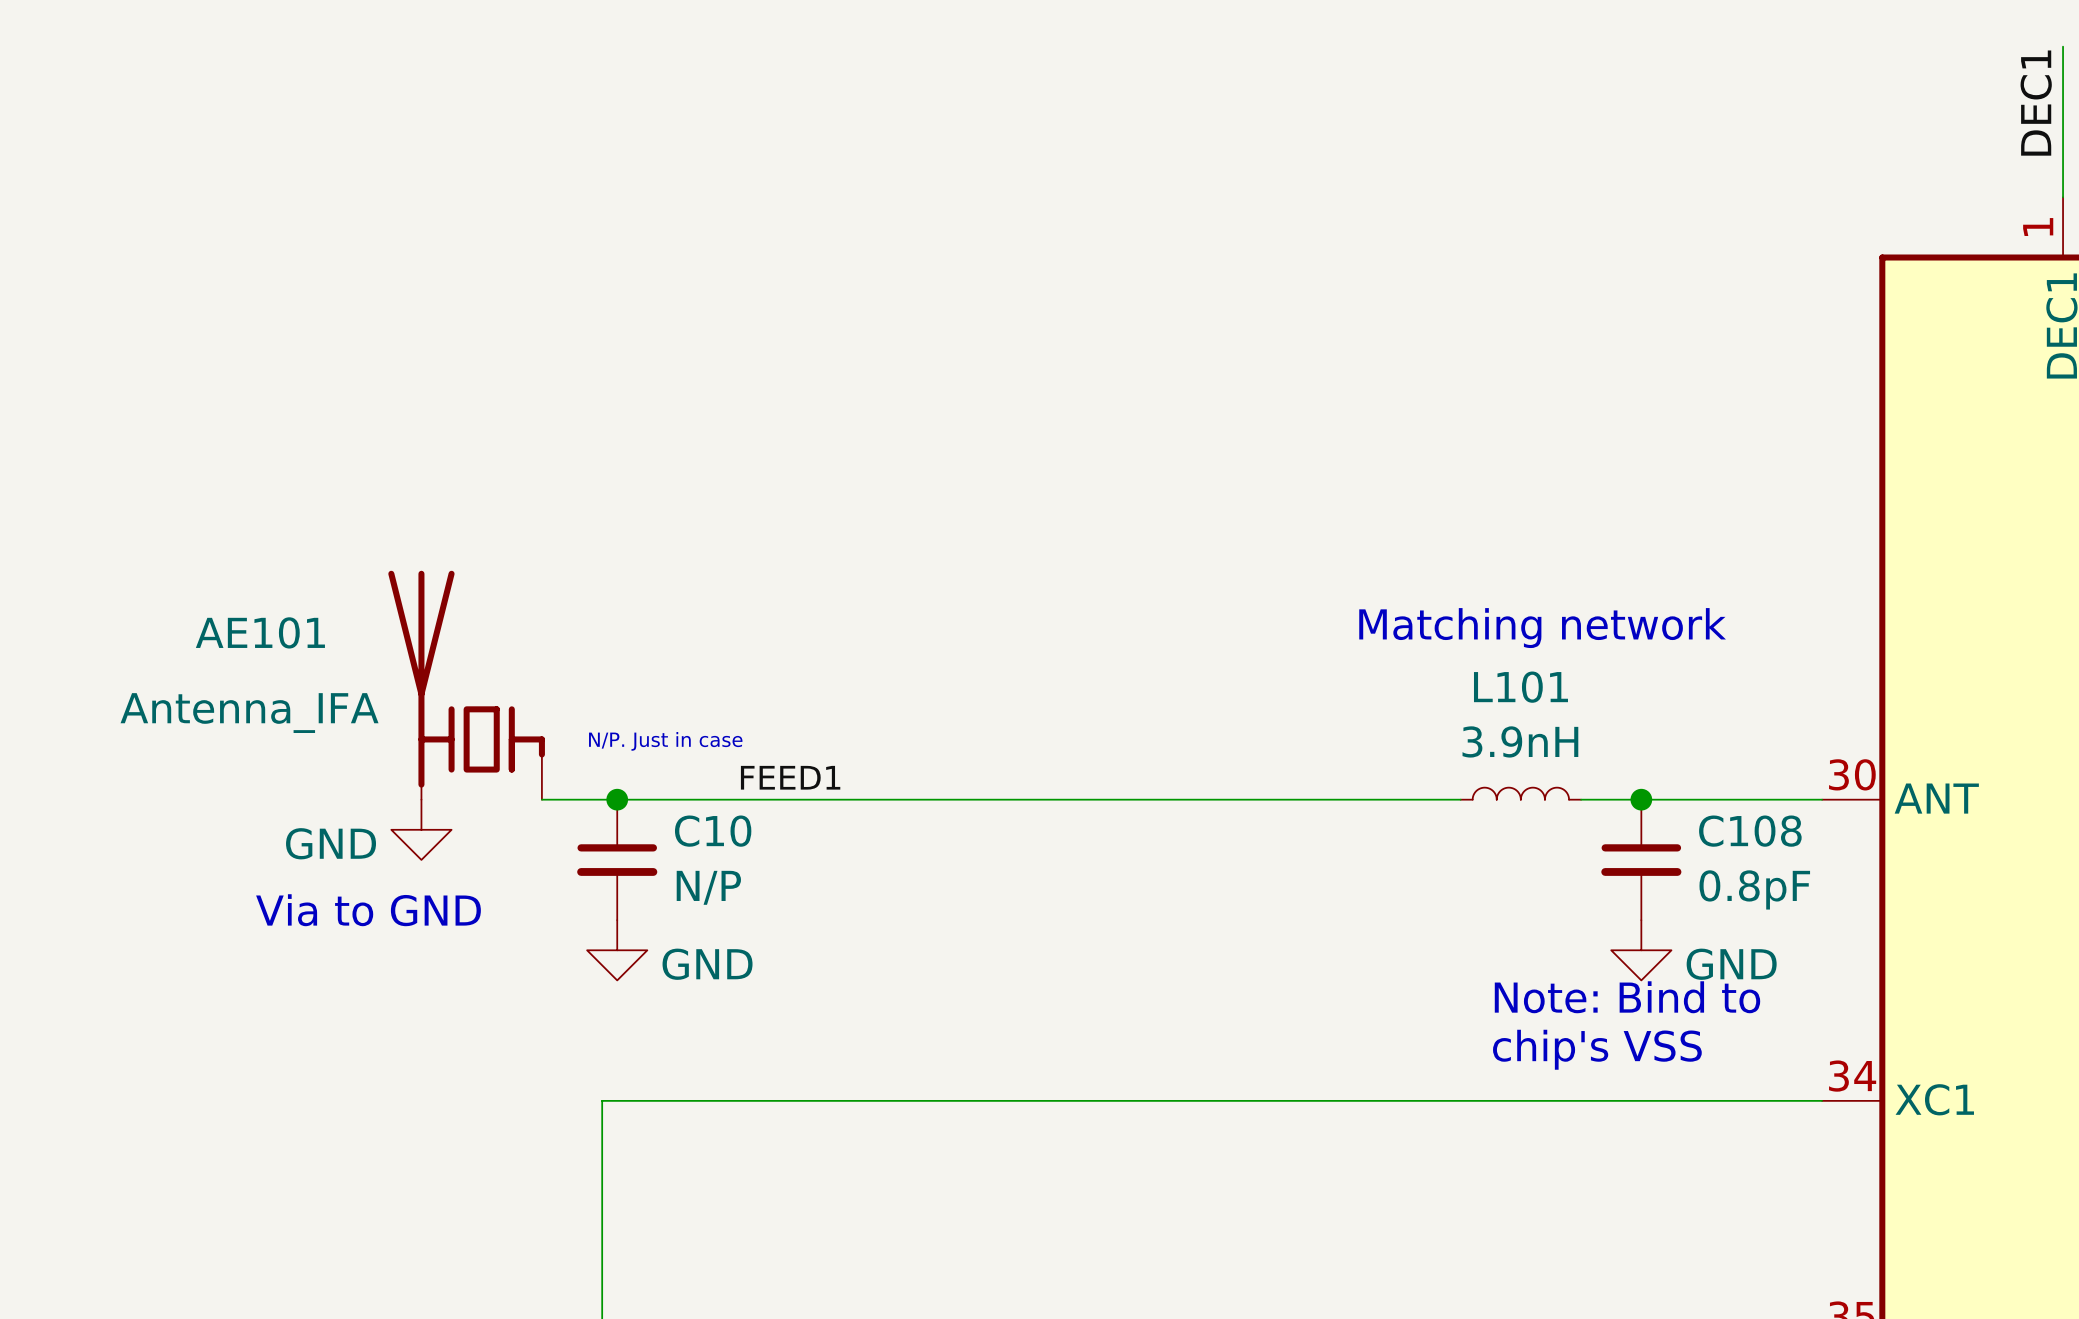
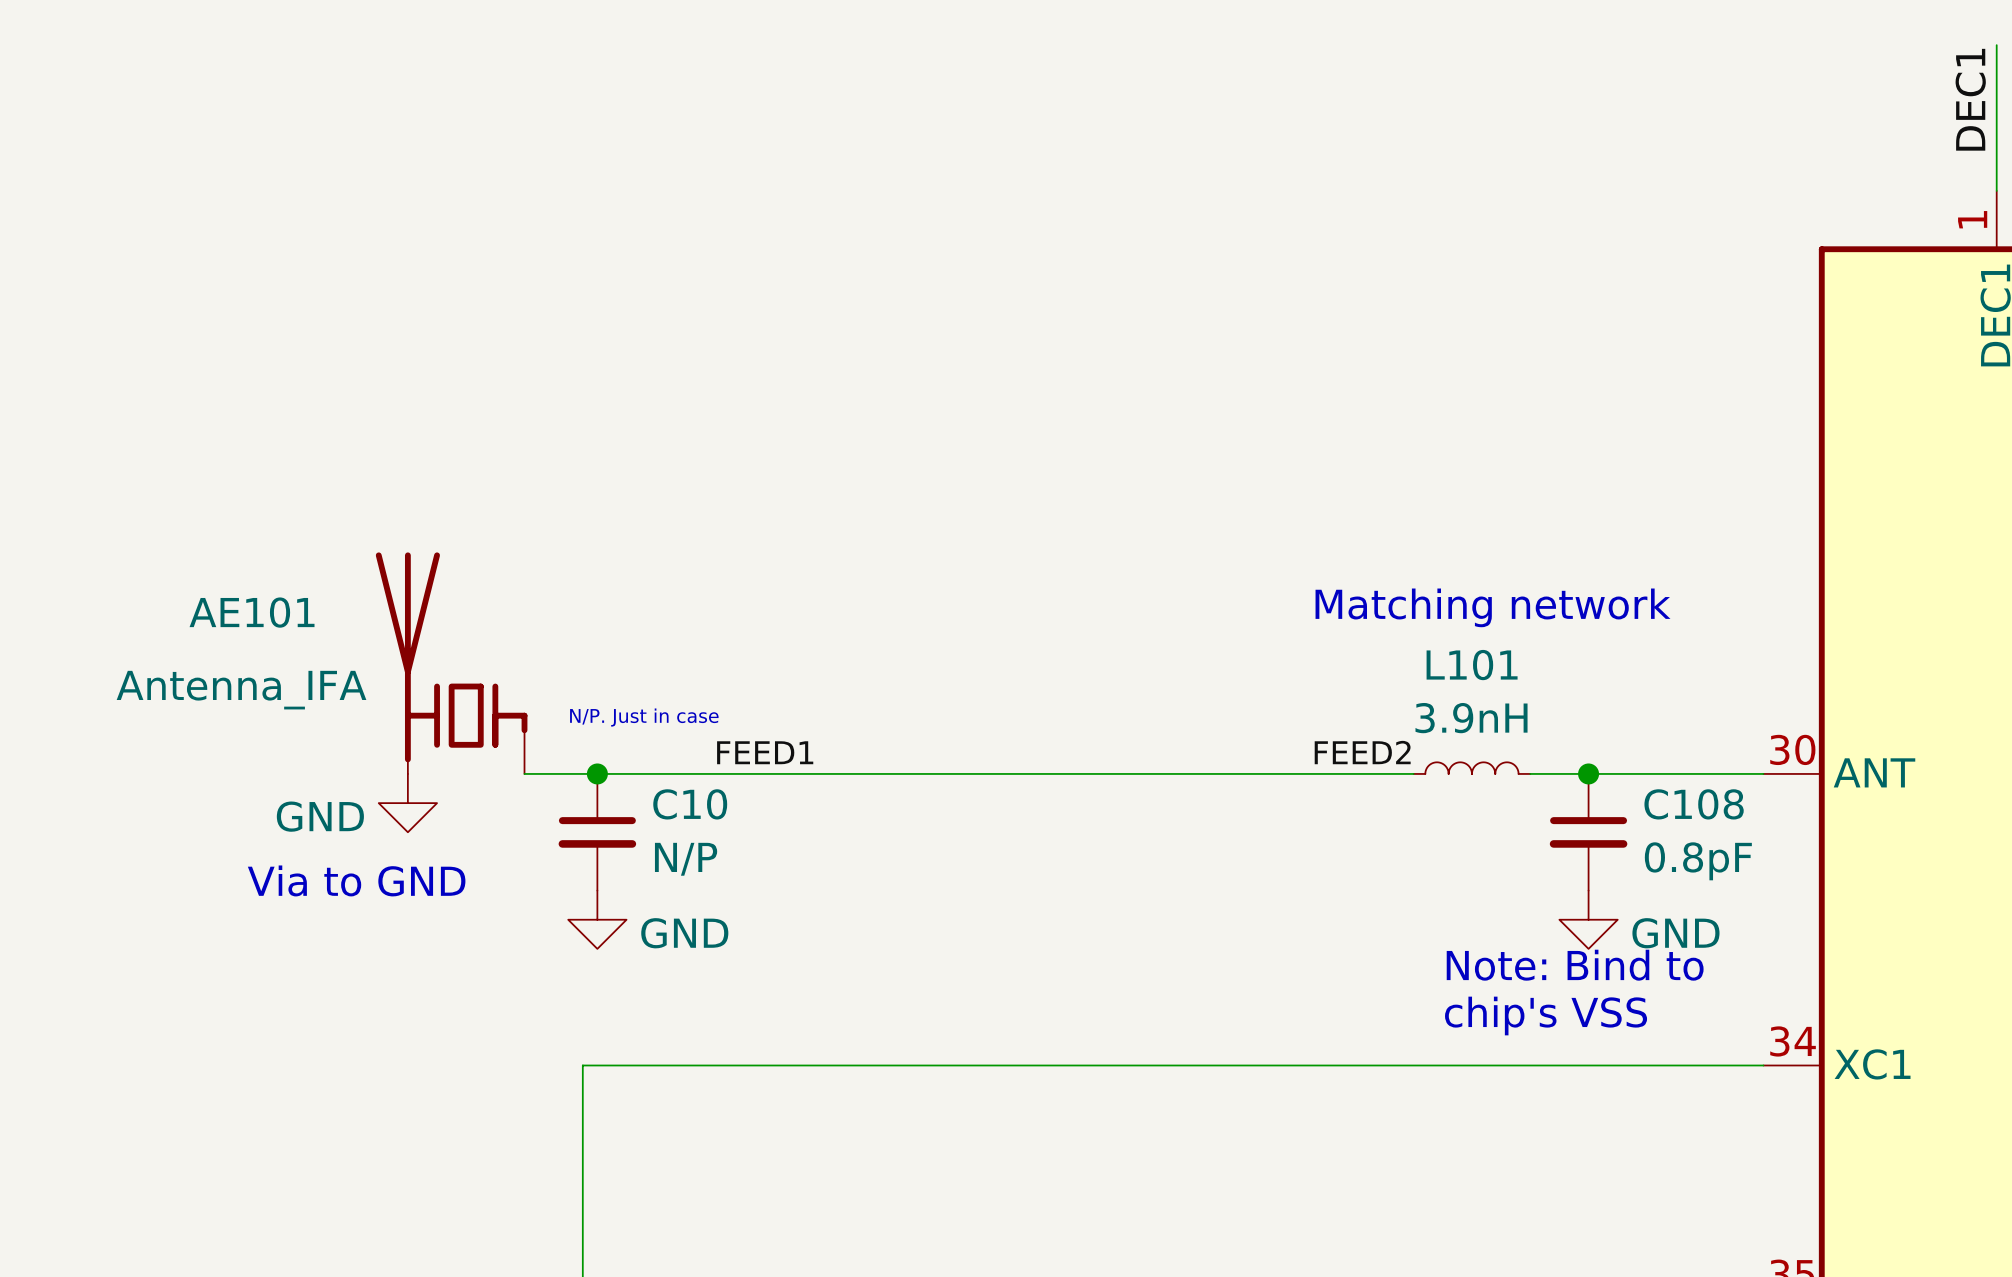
label: none -> FEED2 (1362, 752)

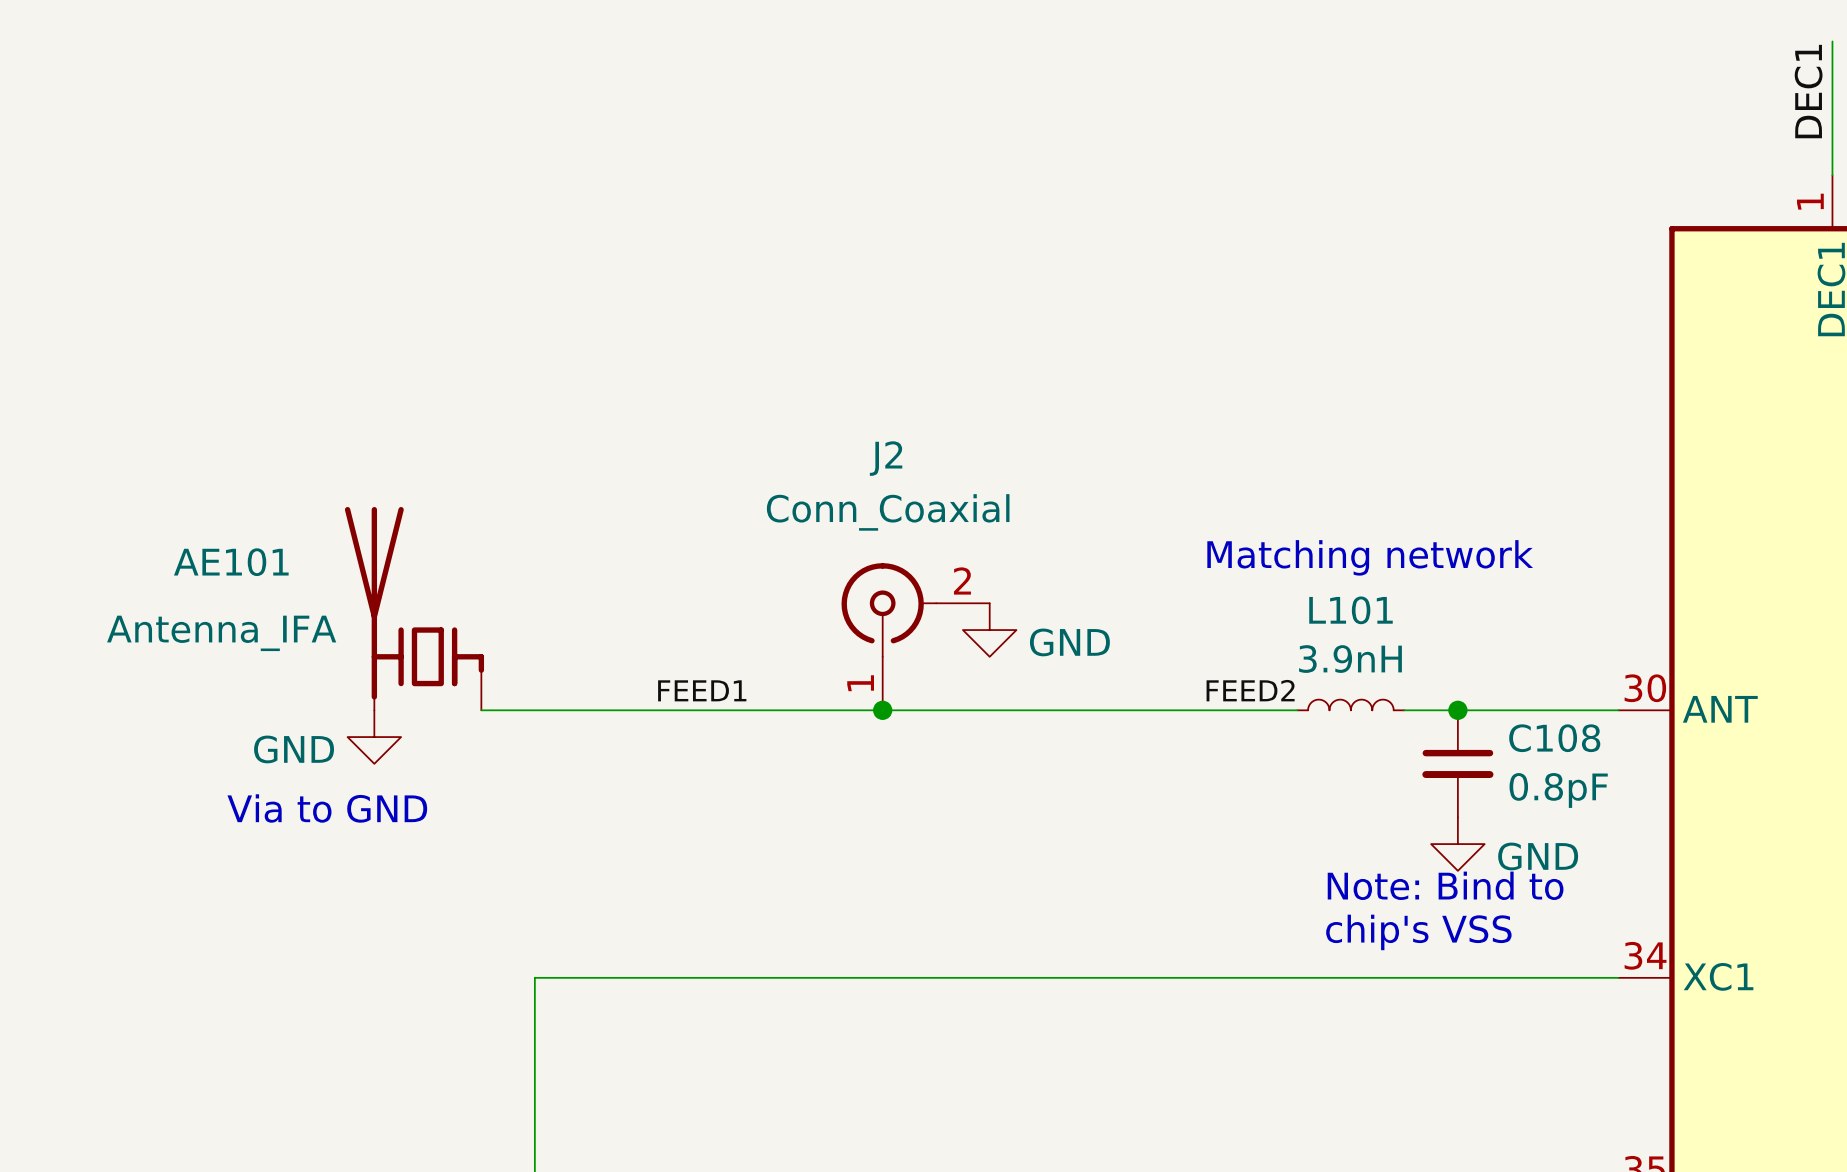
J2: none -> Conn_Coaxial (915, 636)
text: N/P. Just in case (644, 717) -> none
junction: (597, 773) -> none
junction: none -> (882, 710)
C10: N/P (597, 832) -> none
power symbol position: GND (597, 919) -> GND (989, 630)

